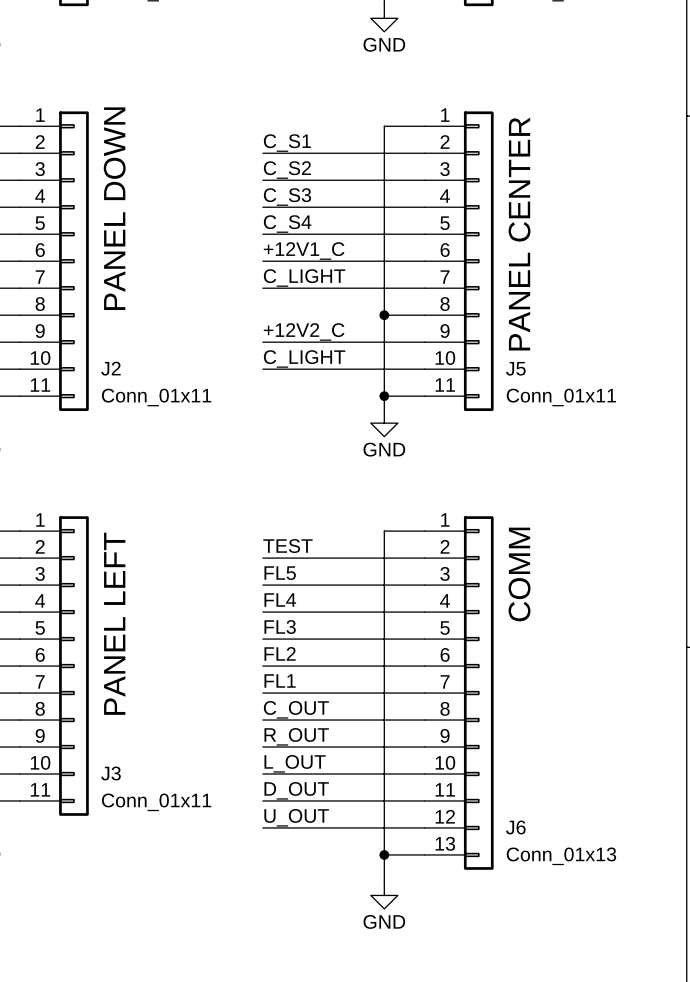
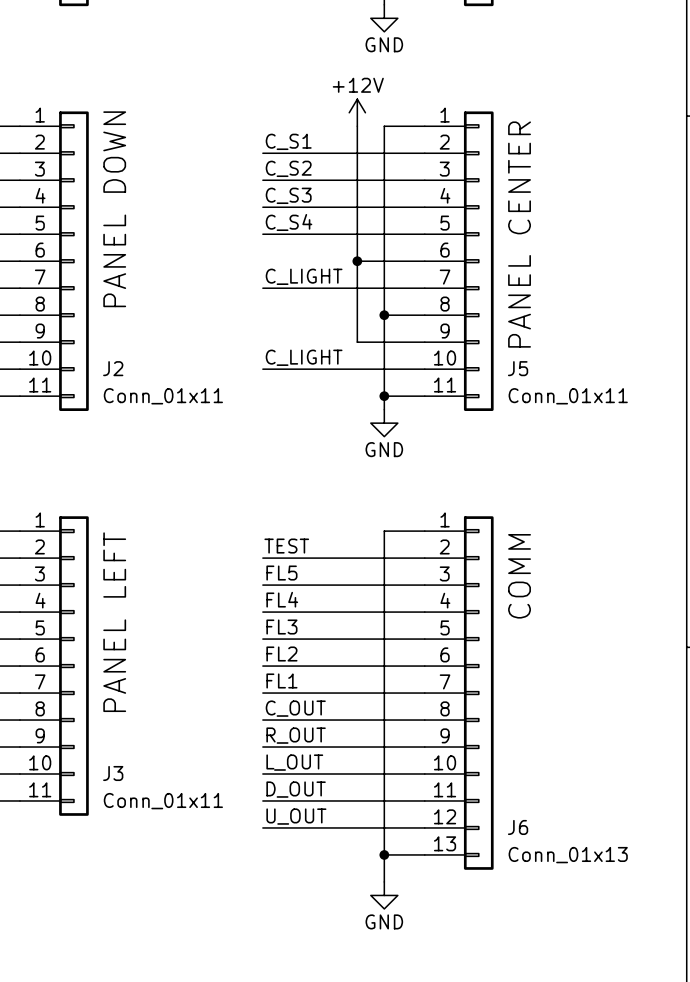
power symbol: none -> +12V (357, 112)
label: +12V1_C (304, 251) -> none
wire: (262, 261) (357, 261) -> none
junction: none -> (357, 261)
label: +12V2_C (304, 331) -> none
wire: (262, 342) (357, 342) -> (357, 126) (357, 342)

